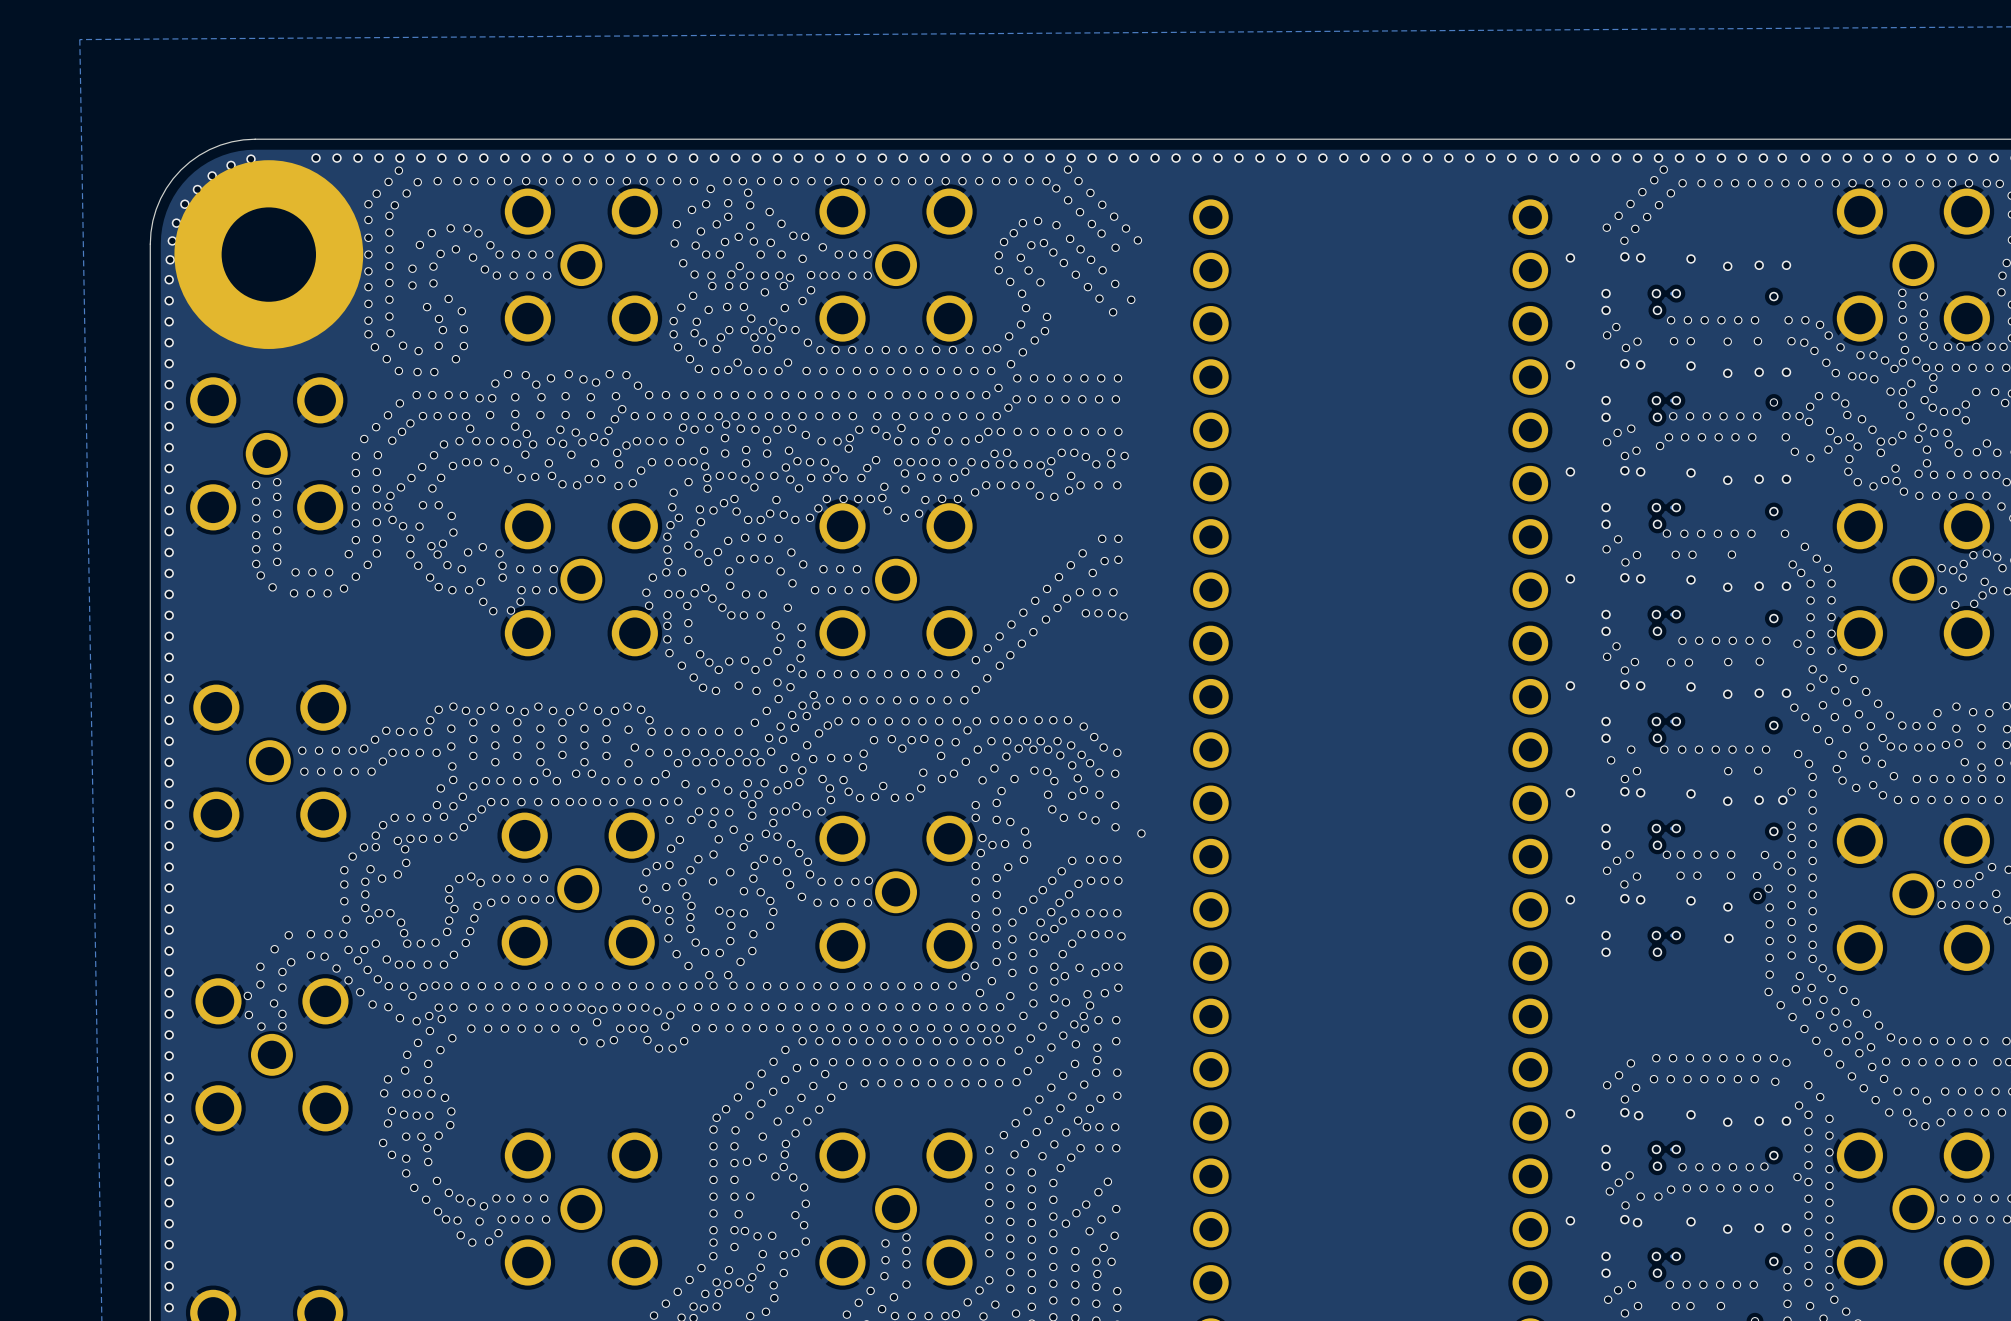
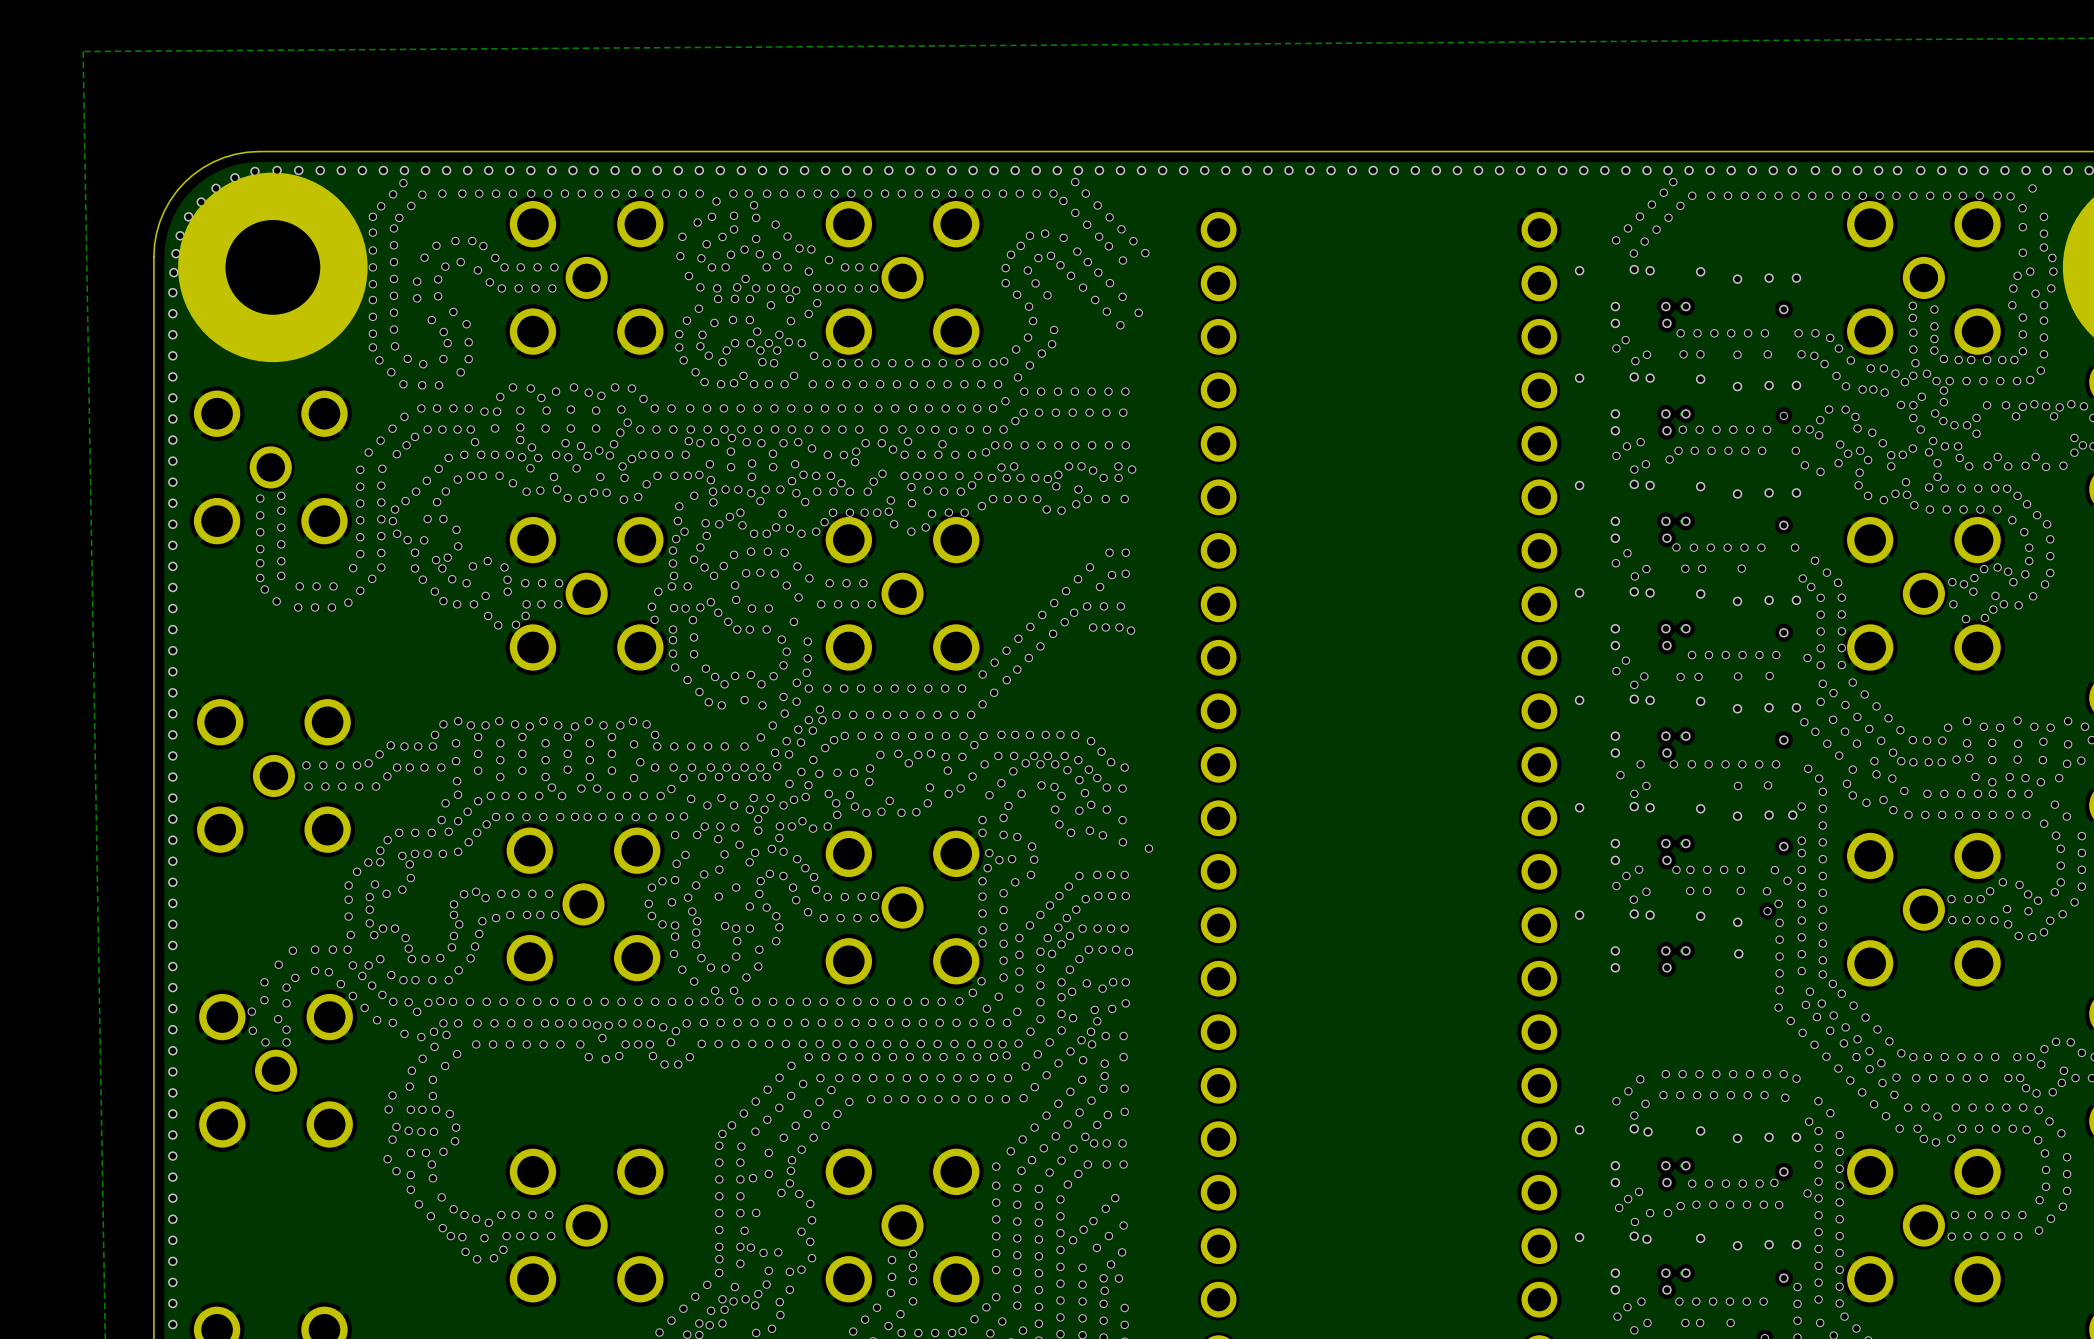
via: none -> (277, 170)
via: none -> (298, 170)

